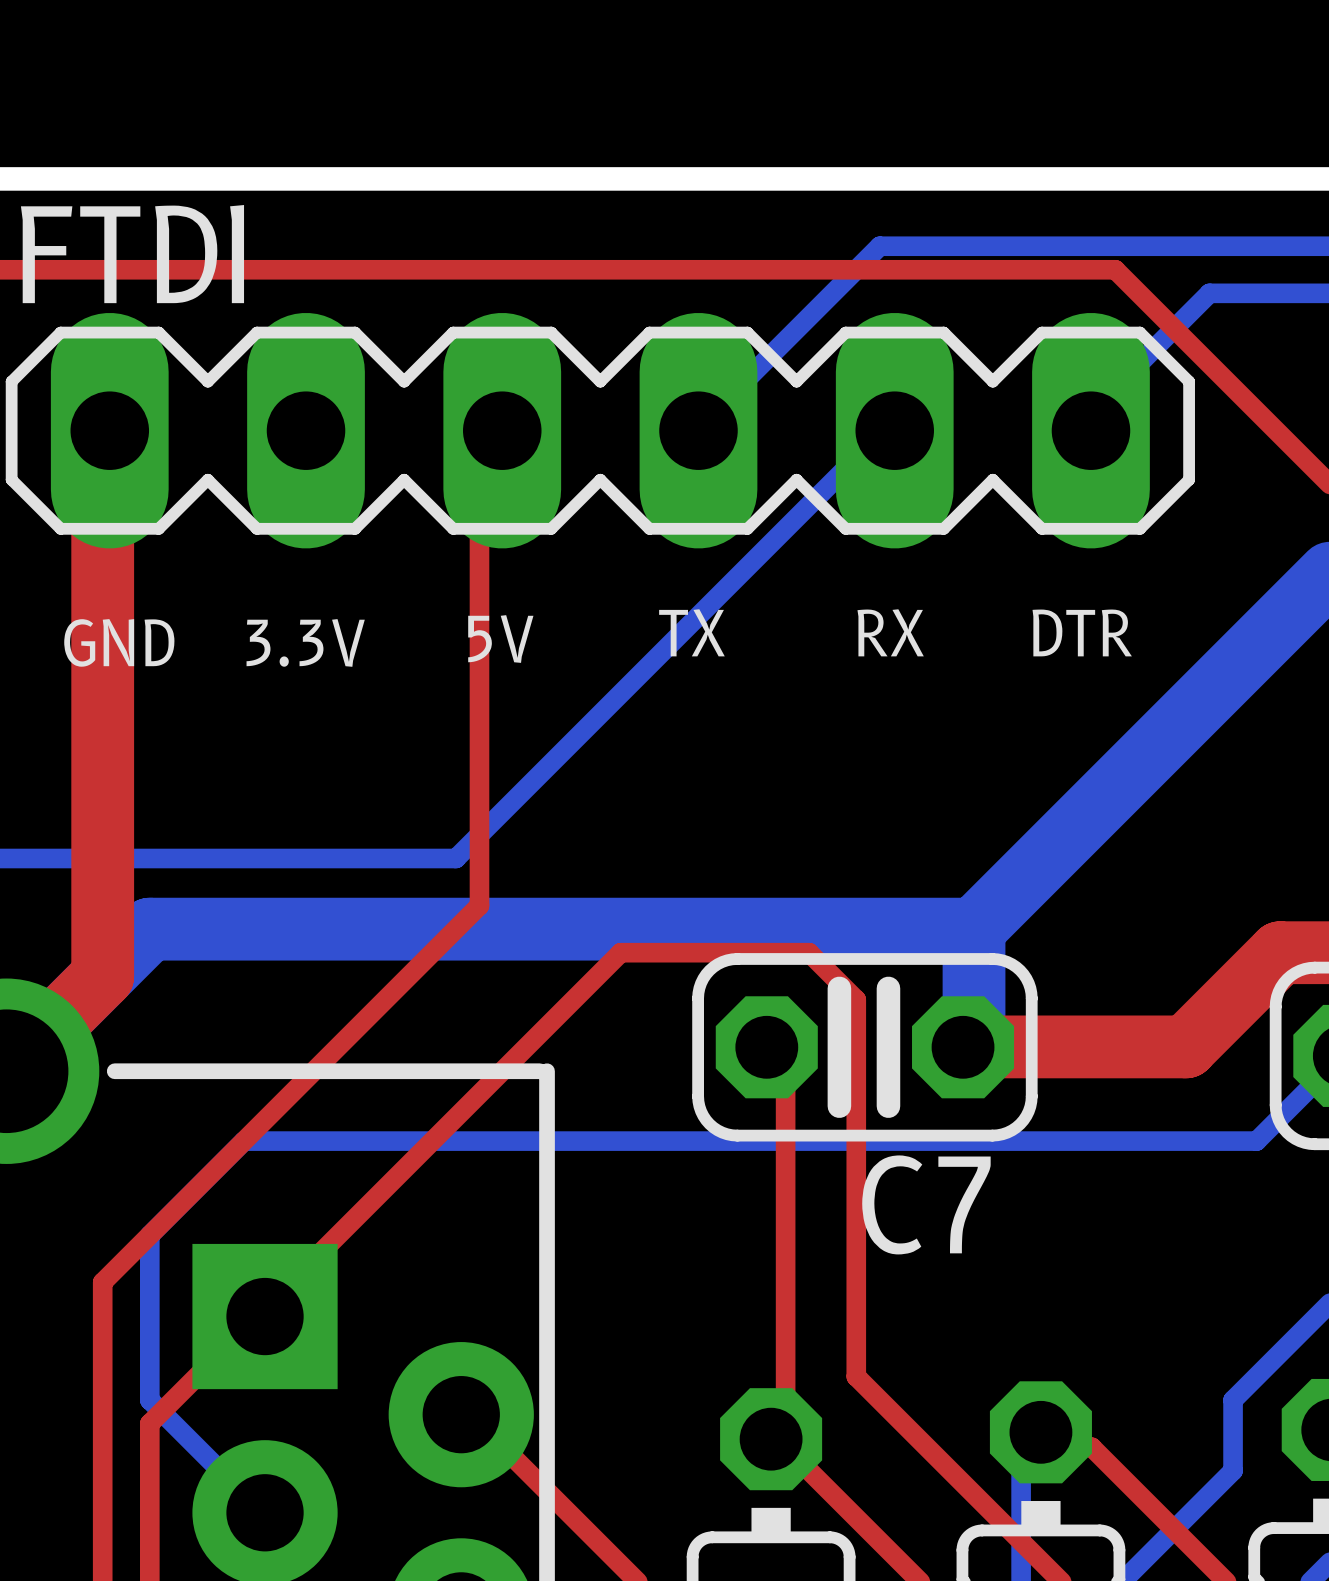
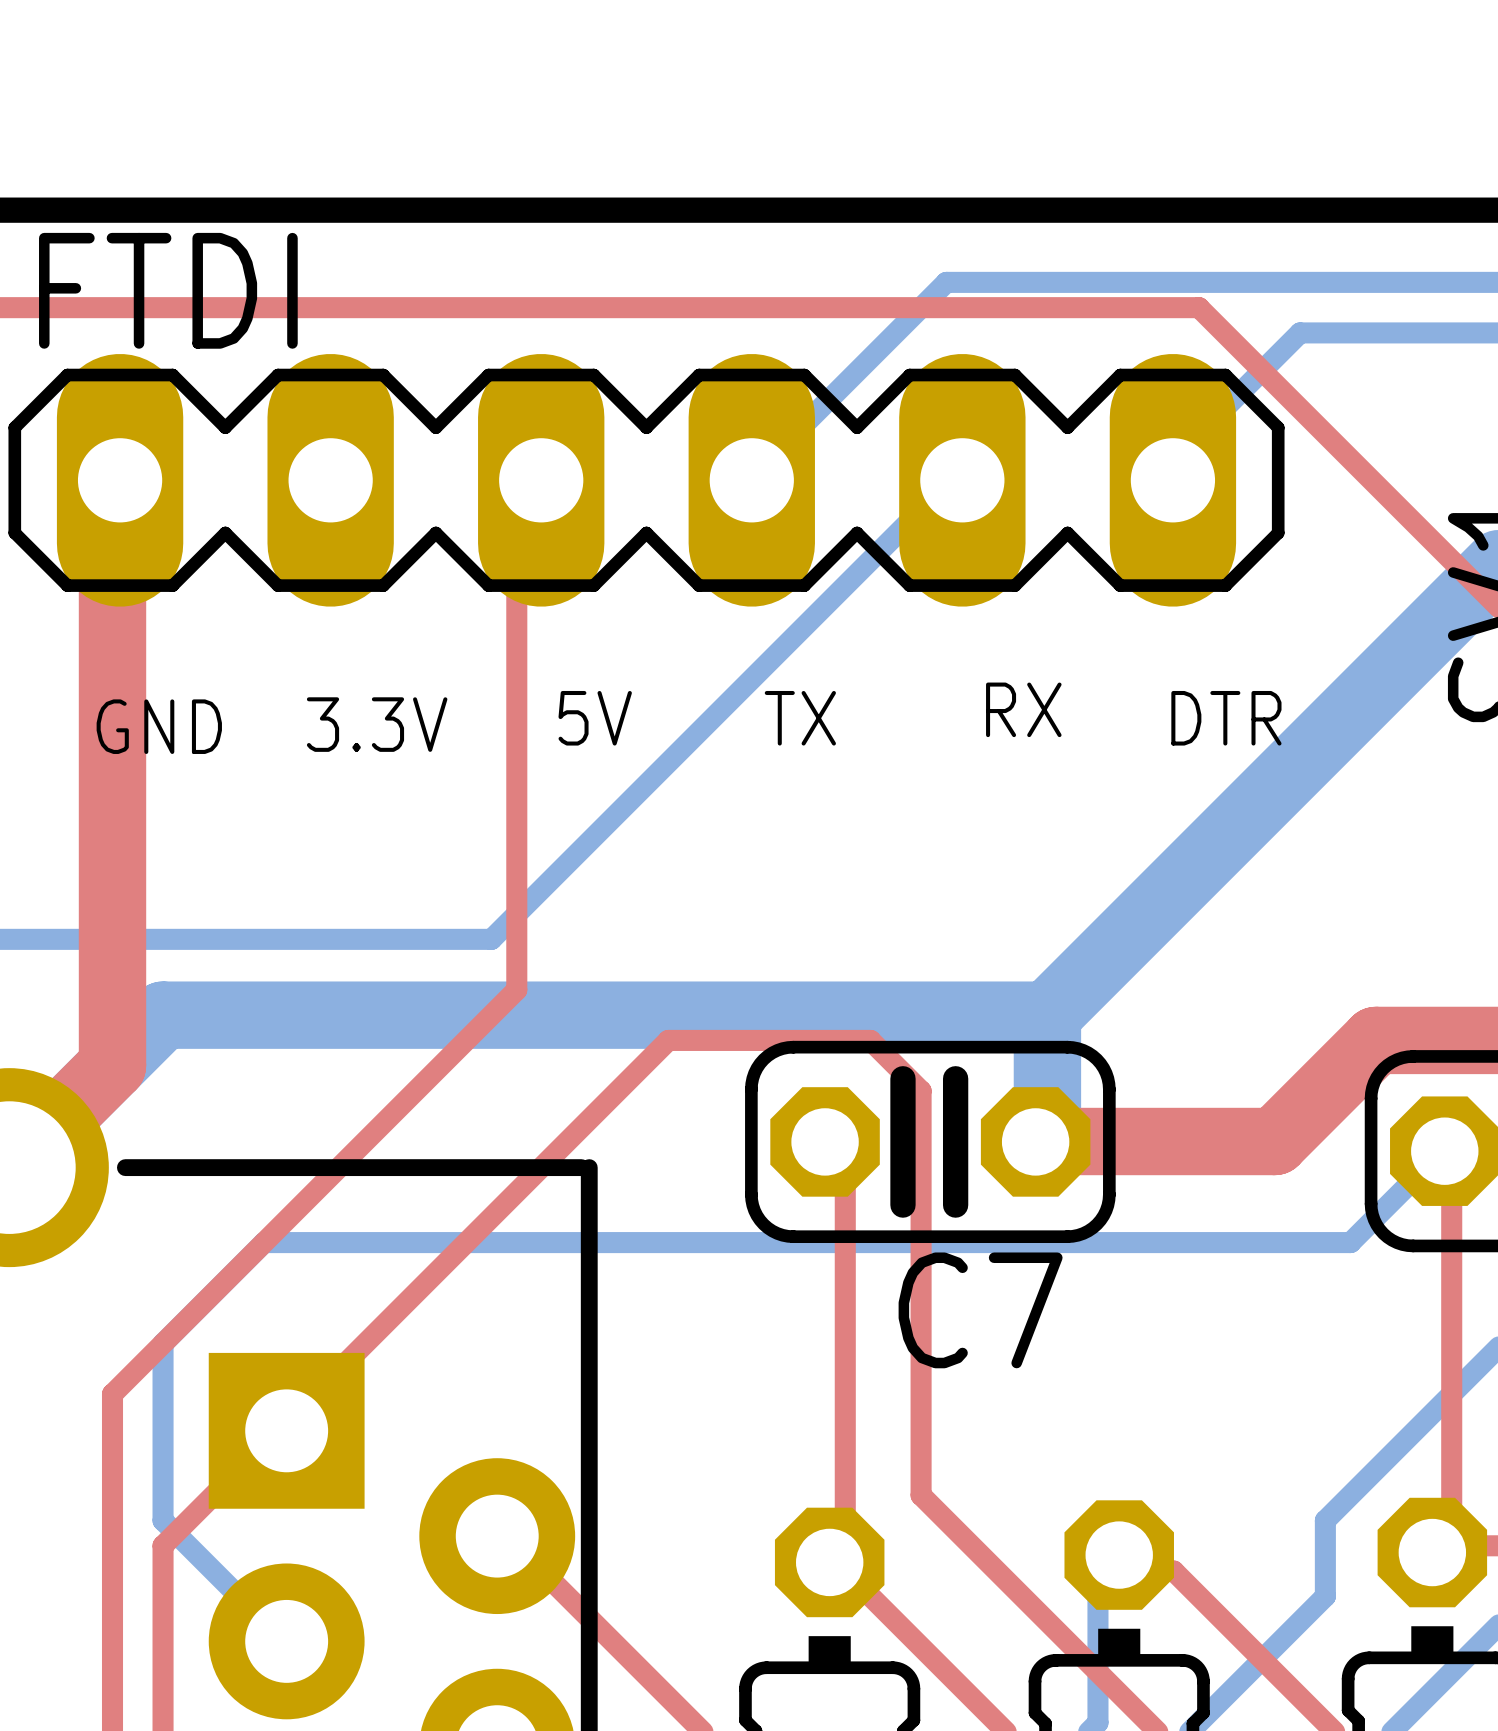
text position: TX (691, 632) -> TX (800, 718)
text position: RX (890, 632) -> RX (1023, 709)
text position: DTR (1082, 632) -> DTR (1226, 718)
text position: 5V (500, 639) -> 5V (595, 718)
text position: GND (119, 642) -> GND (159, 726)
text position: 3.3V (305, 642) -> 3.3V (377, 724)

